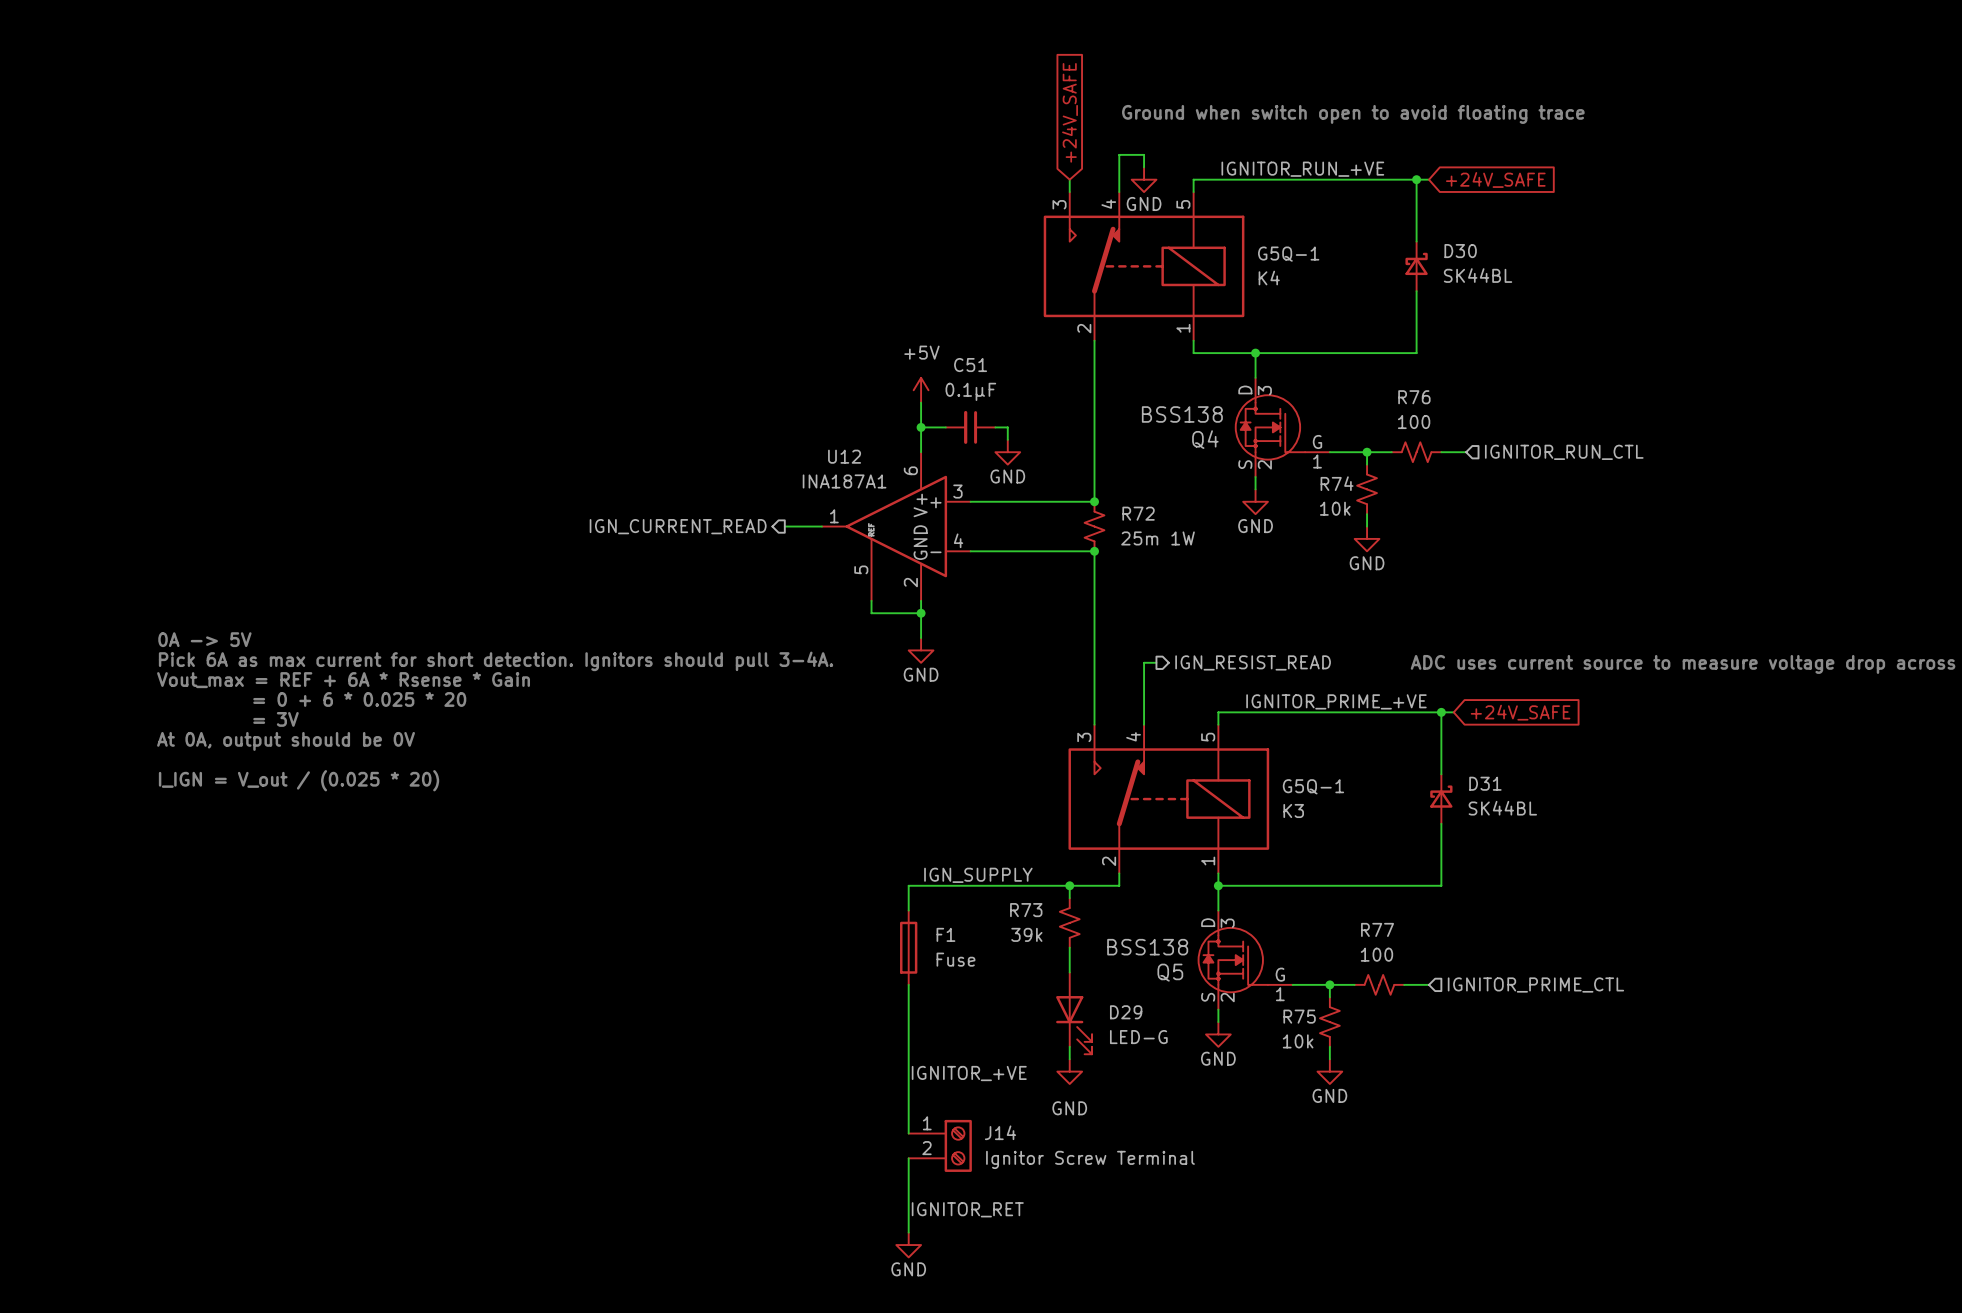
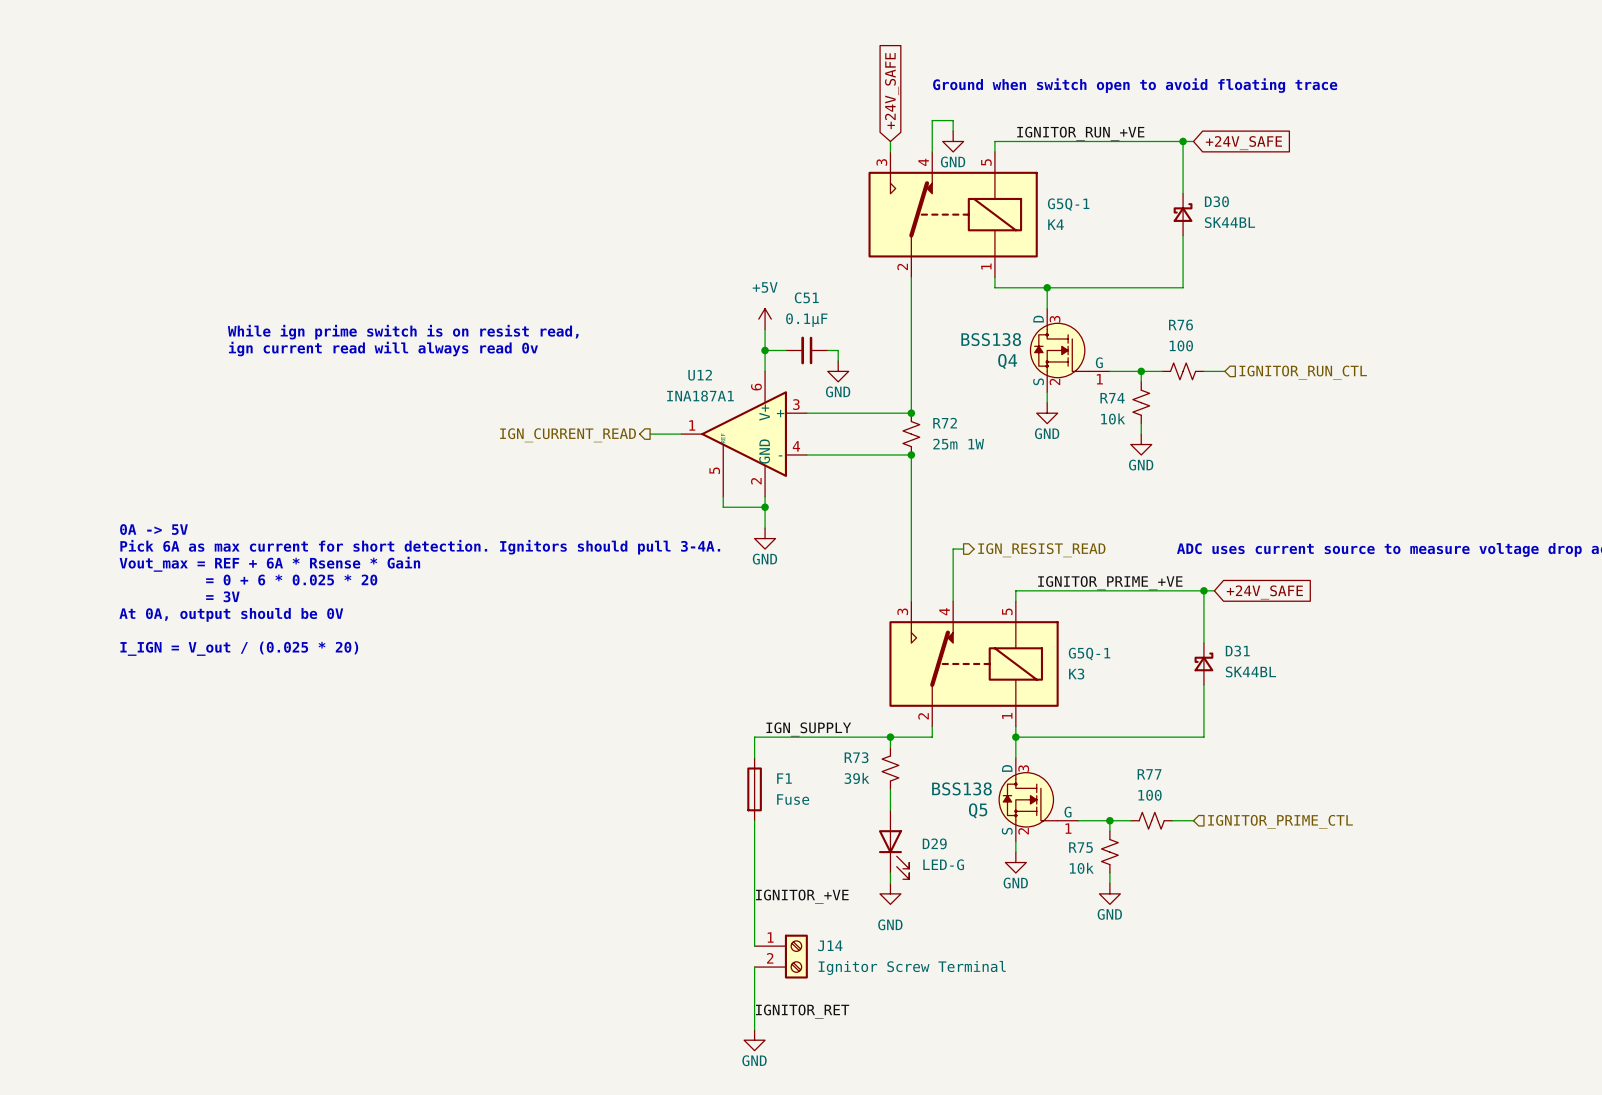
text: none -> While ign prime switch is on resist read, (403, 332)
text: none -> ign current read will always read 0v (383, 348)

